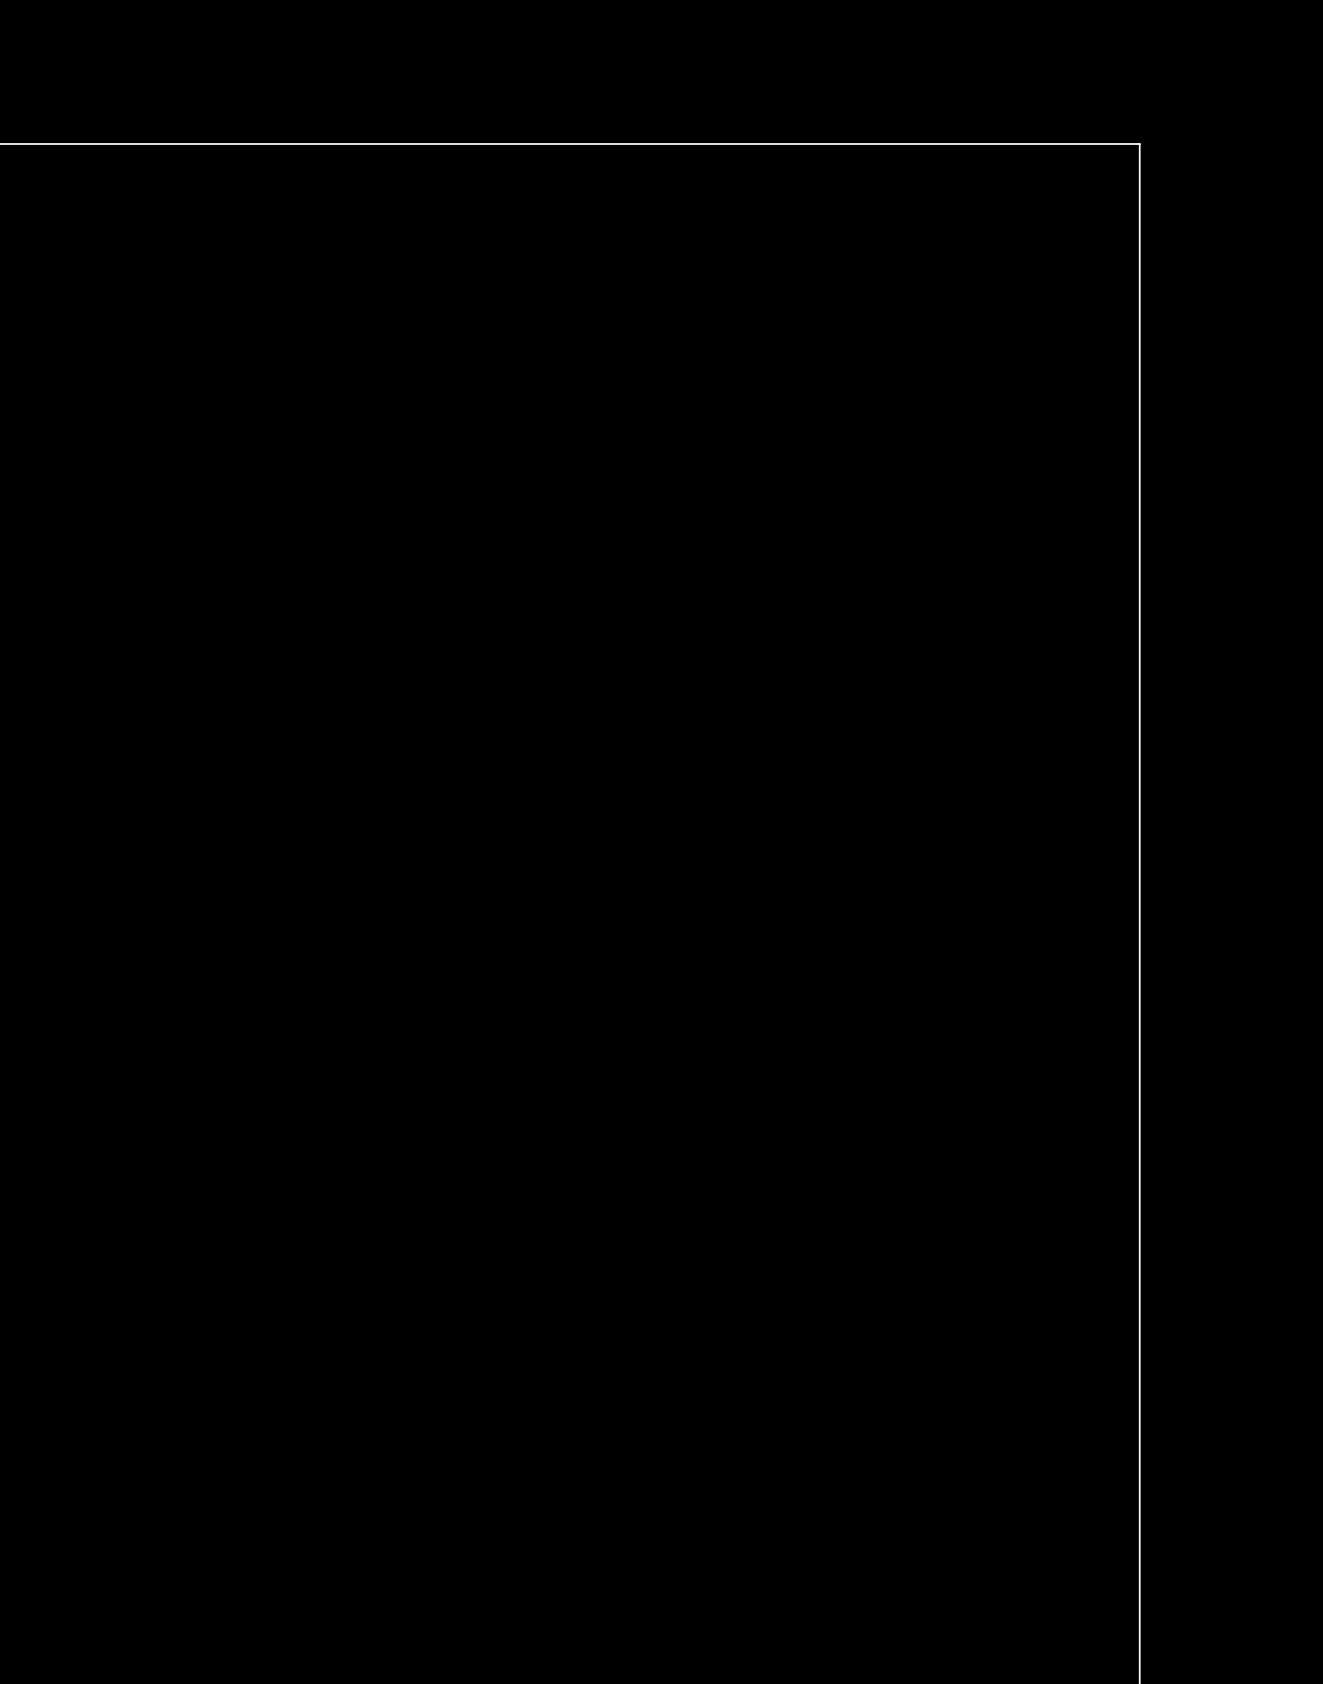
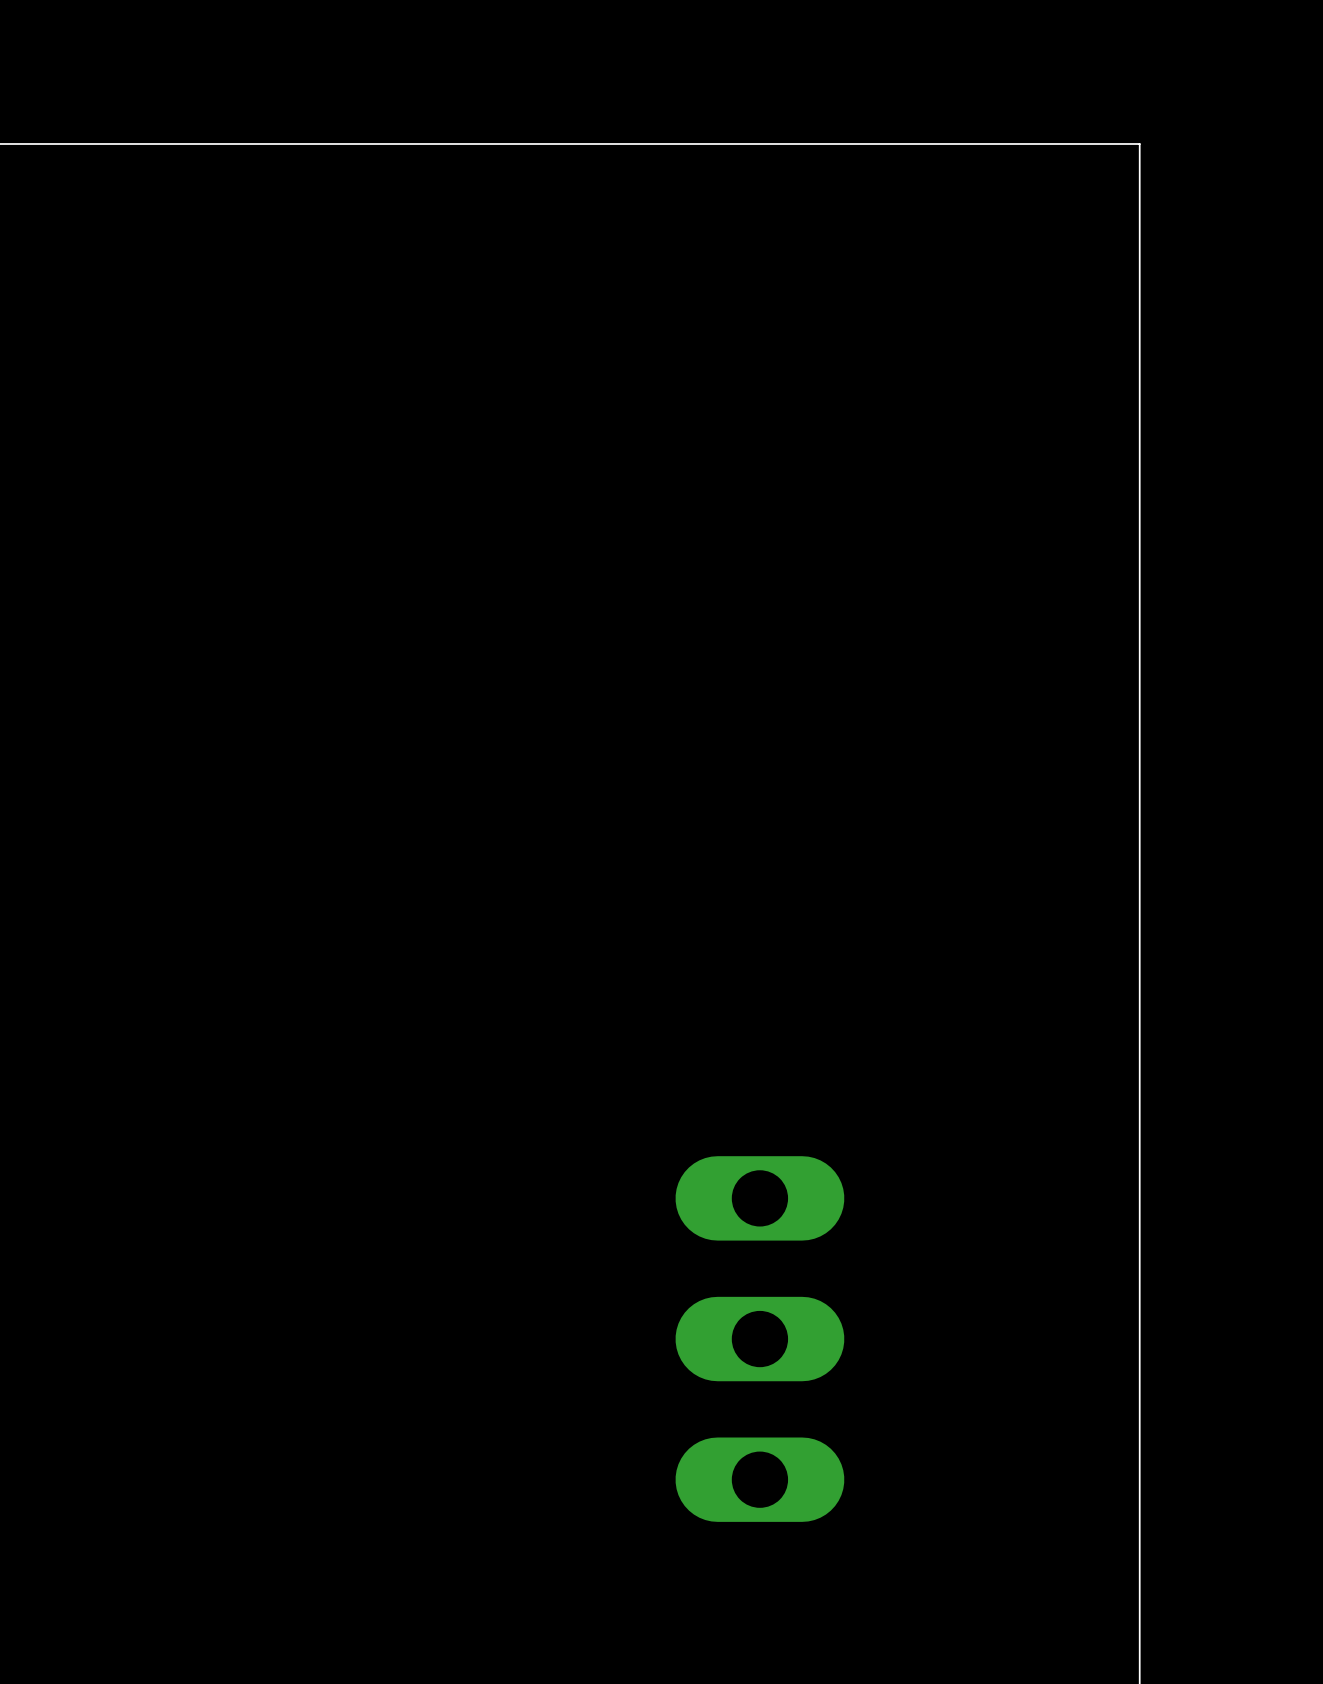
part: none -> (759, 1339)

